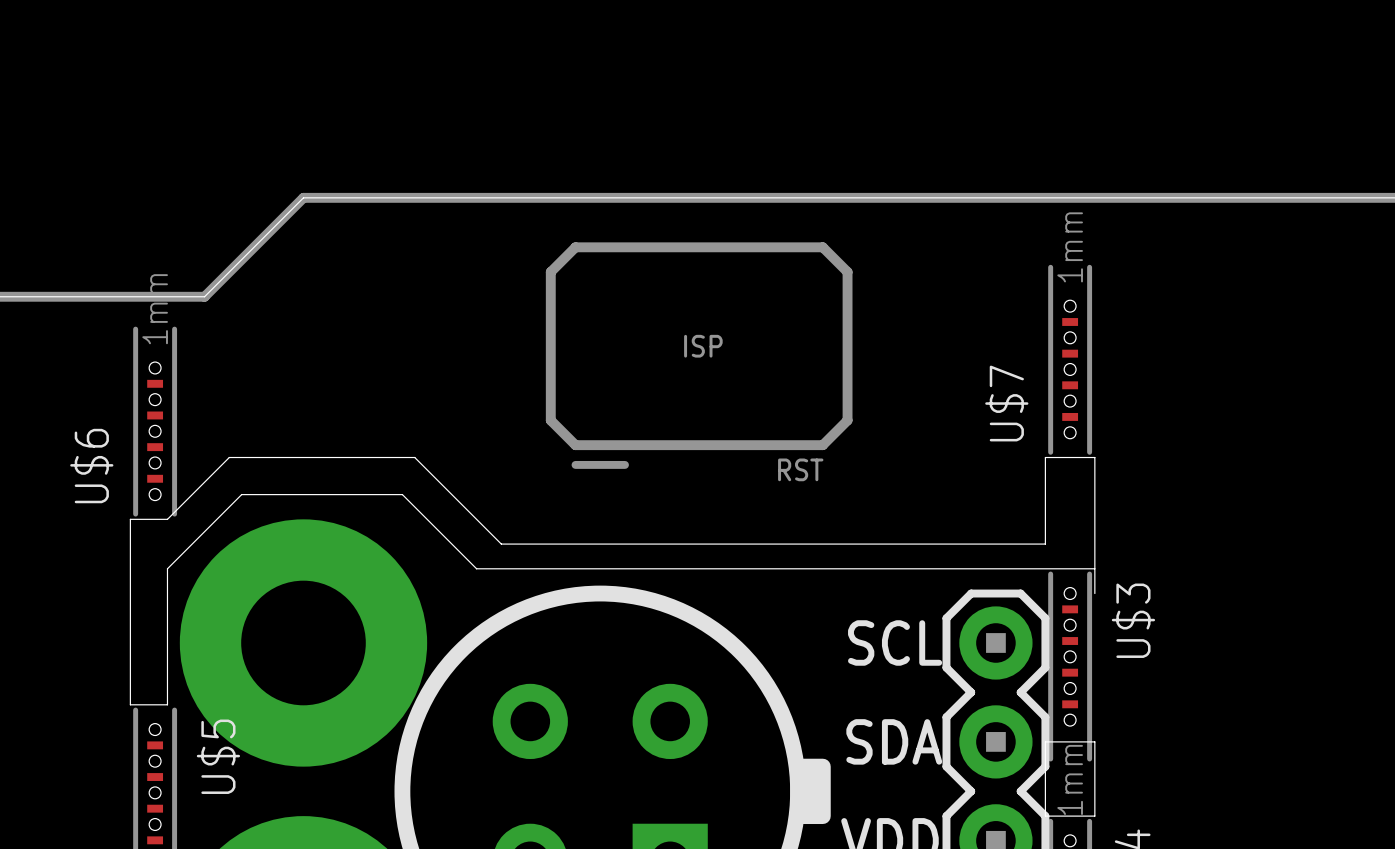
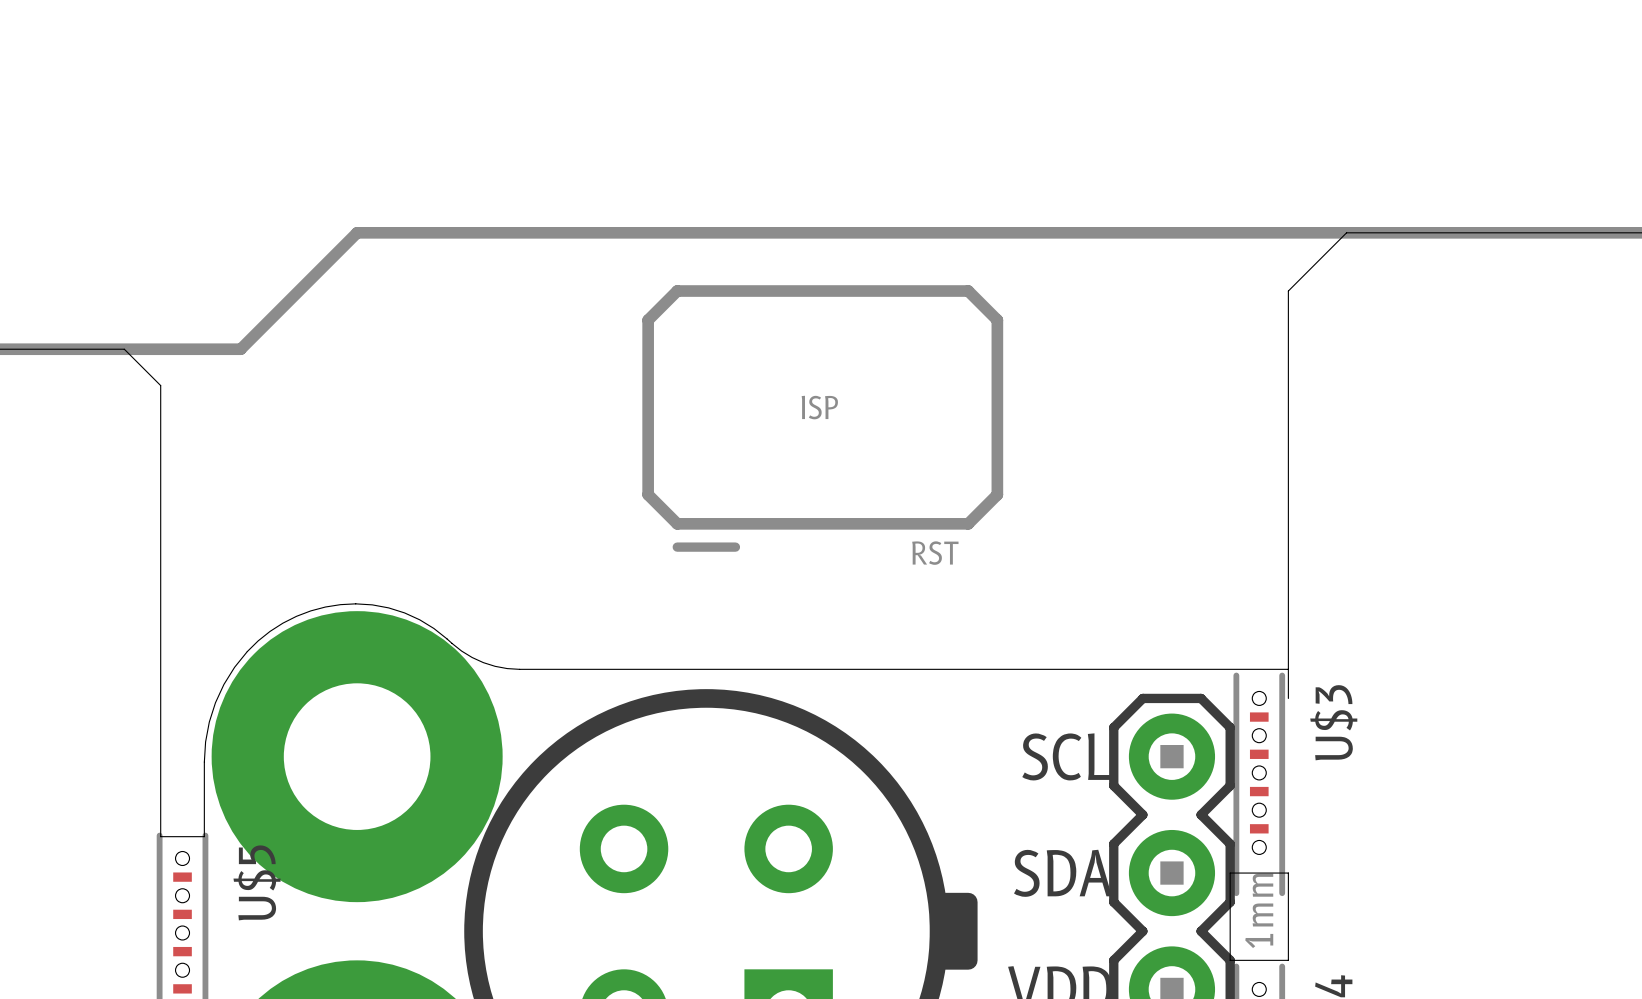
board edge: (1144, 197) (303, 197) (204, 296) (105, 296) -> (560, 669) (507, 668) (483, 662) (461, 651) (433, 628) (419, 619) (388, 607) (372, 604) (340, 604) (310, 610) (296, 616) (270, 631) (247, 651) (223, 684) (215, 702) (205, 741) (204, 836) (160, 836) (160, 385) (124, 349)
U$7: (1070, 359) -> none
U$6: (155, 421) -> none
board edge: (1094, 457) (1045, 457) (1045, 544) (501, 544) (414, 457) (229, 457) (167, 519) (130, 519) (130, 704) (167, 704) (167, 568) (241, 494) (402, 494) (476, 568) -> (1288, 538) (1288, 291) (1346, 232)

